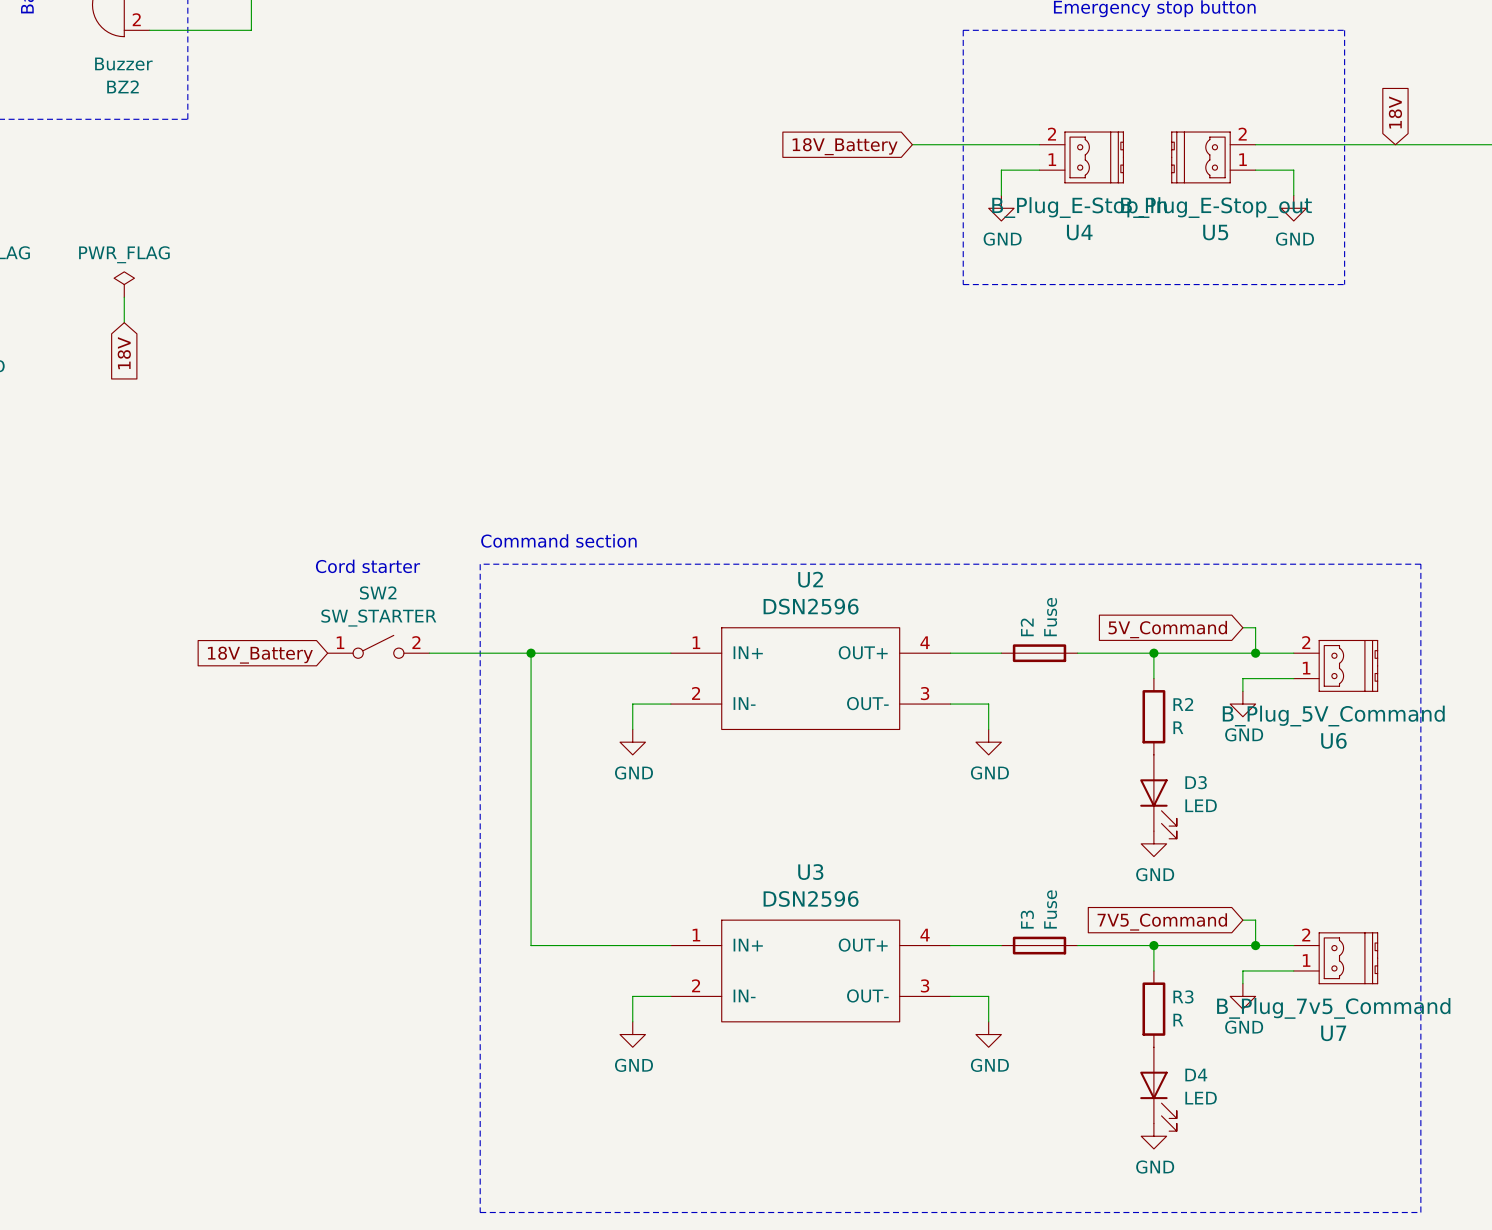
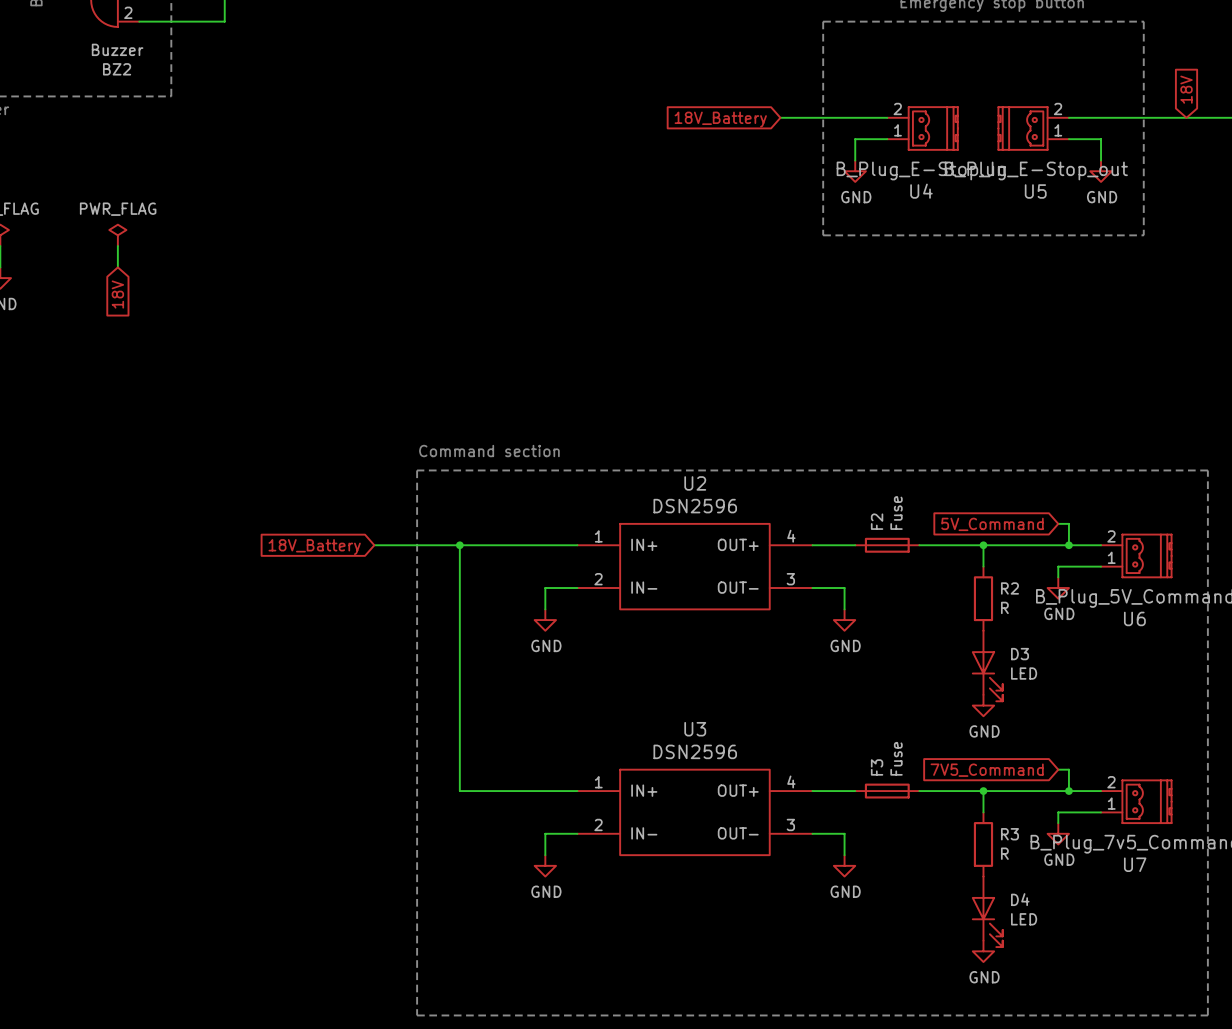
text: Cord starter (368, 566) -> none
SW2: SW_STARTER (378, 646) -> none
global label position: 18V_Battery (260, 655) -> 18V_Battery (314, 547)

